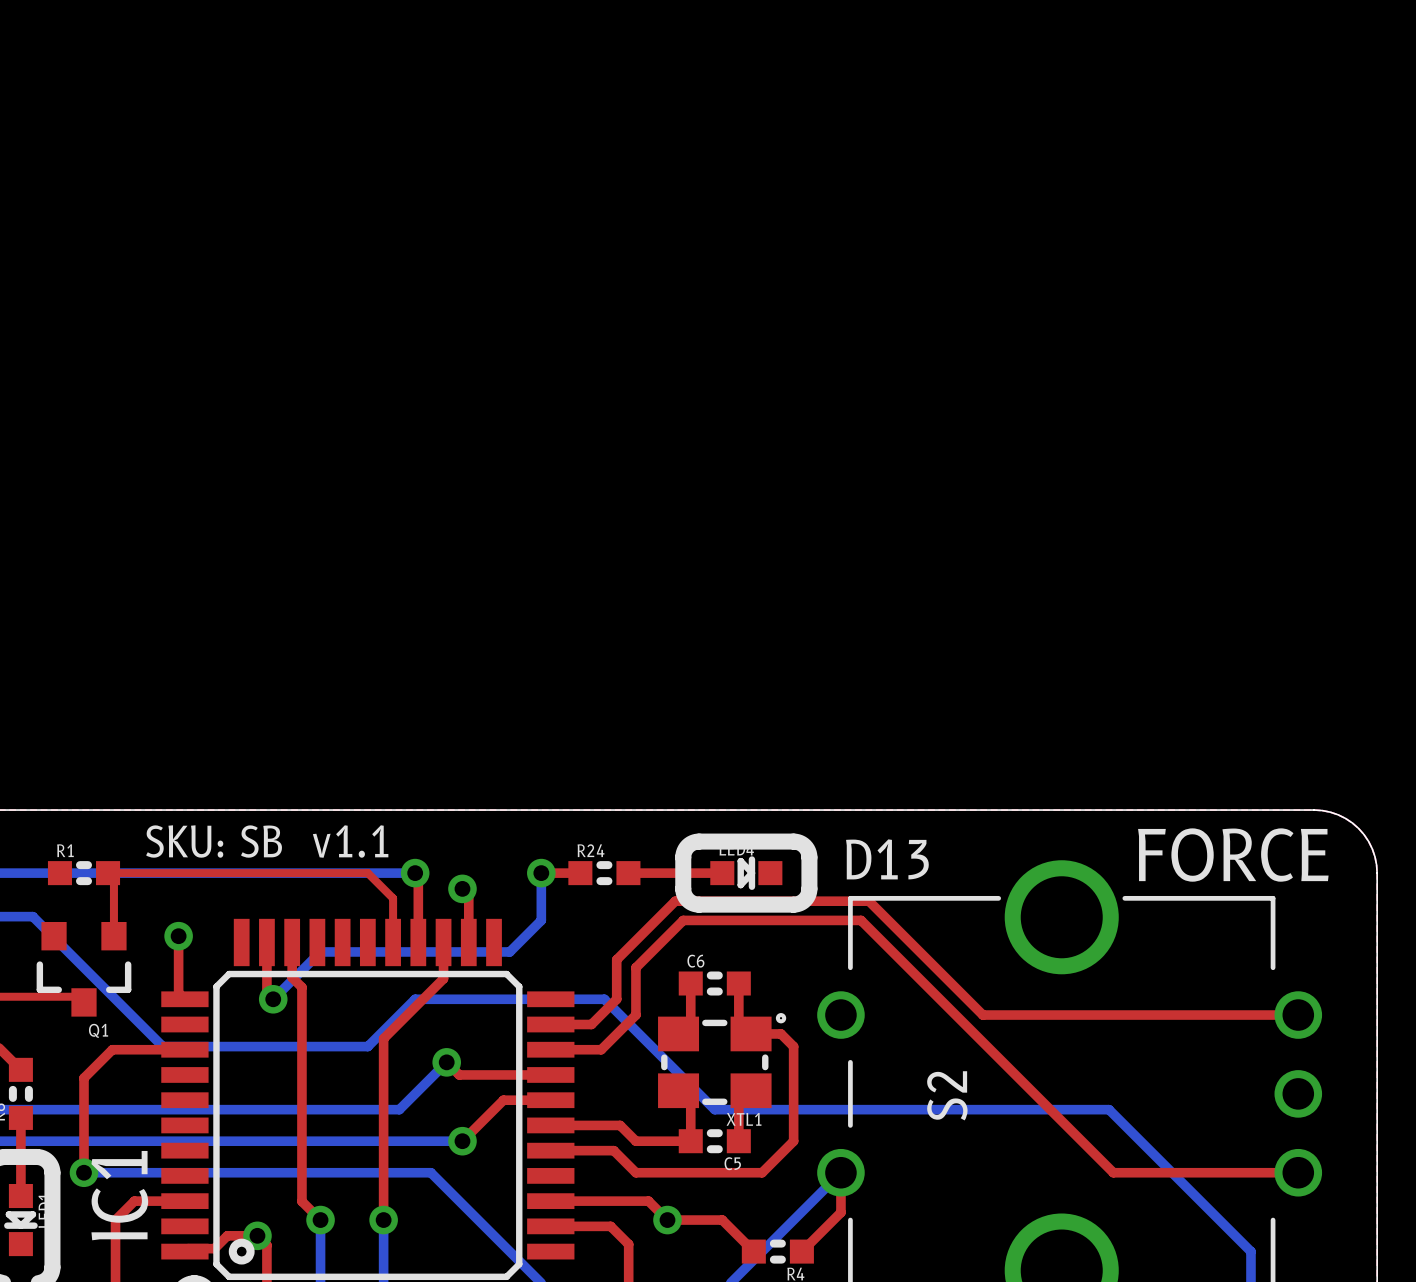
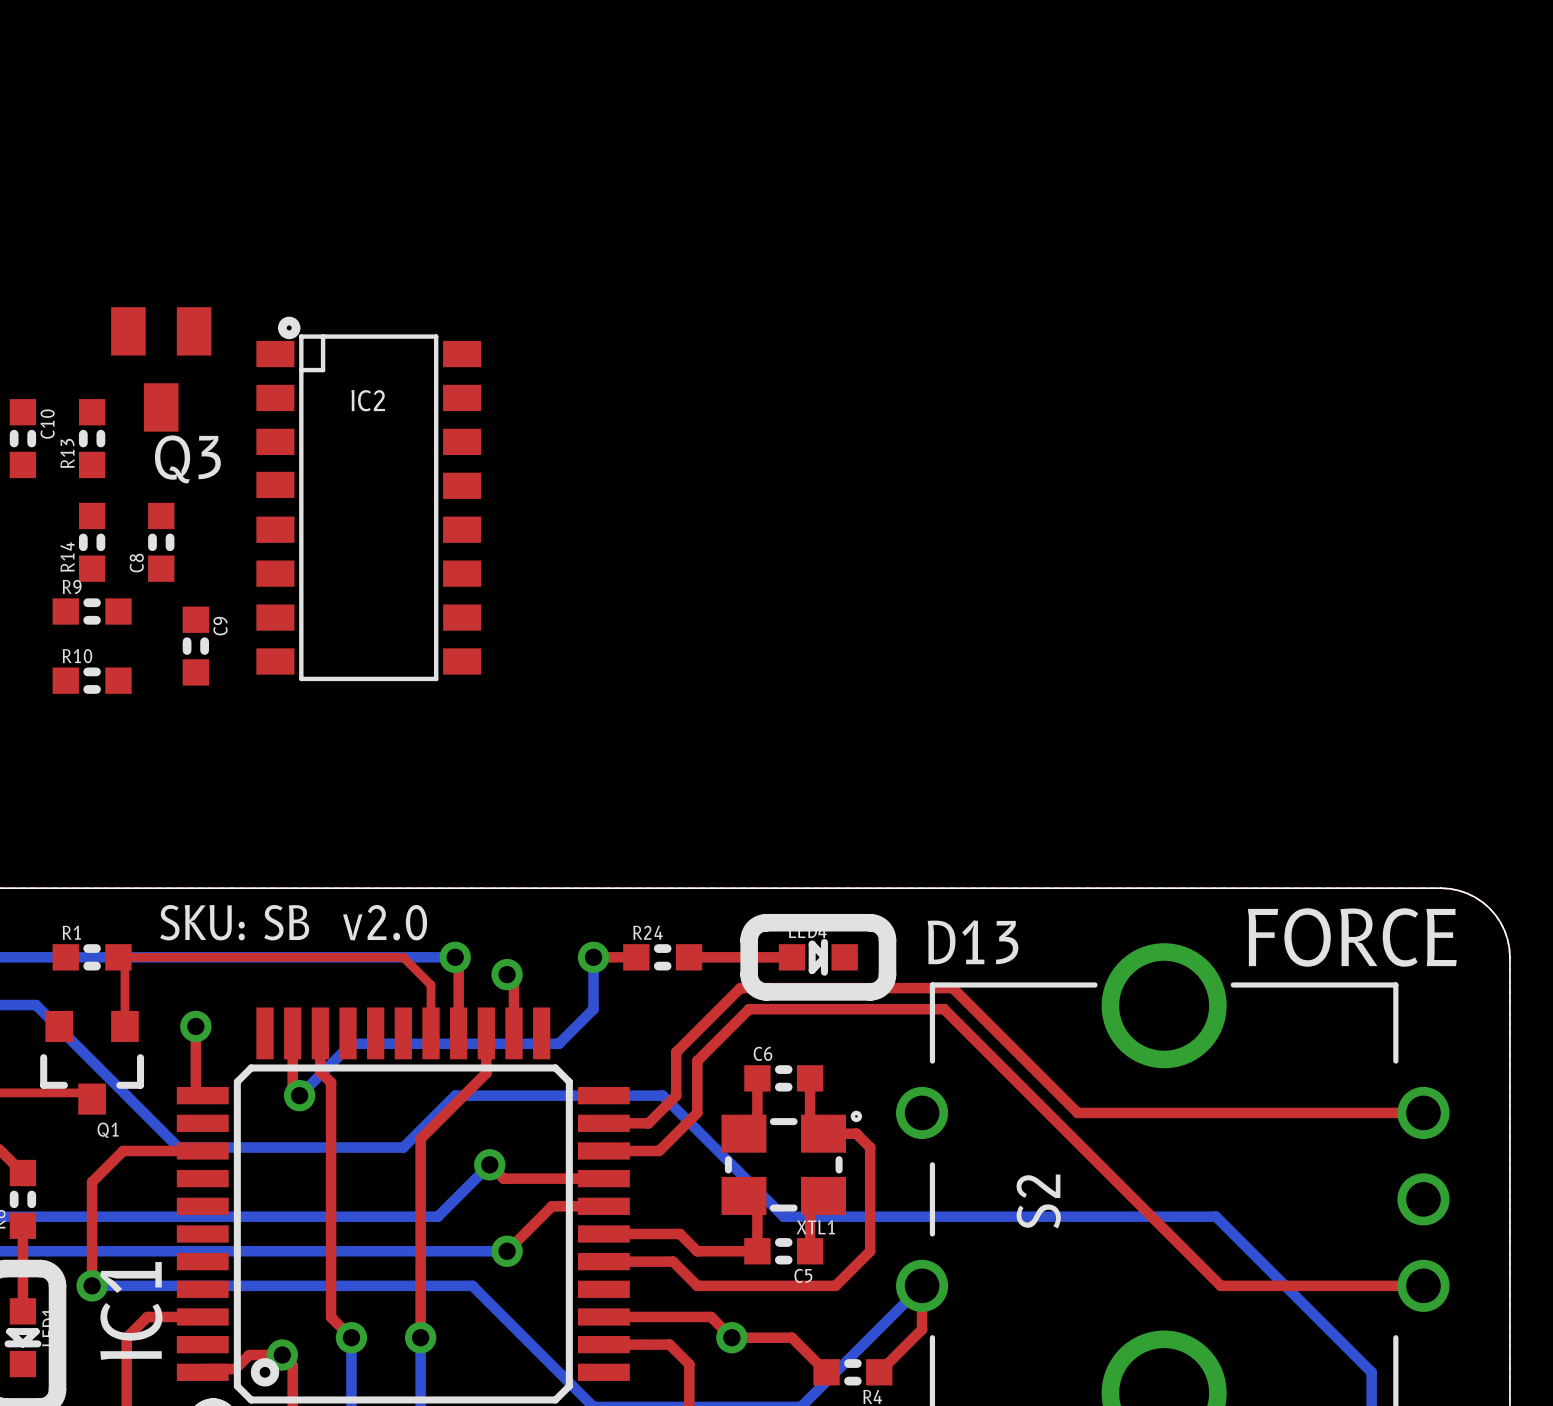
Q3: none -> (161, 369)
C10: none -> (22, 438)
R13: none -> (92, 438)
IC2: none -> (368, 498)
R14: none -> (92, 542)
C8: none -> (161, 542)
R9: none -> (92, 611)
C9: none -> (195, 646)
R10: none -> (92, 680)
text: SKU: SB v1.1 (267, 841) -> SKU: SB v2.0 (293, 922)

